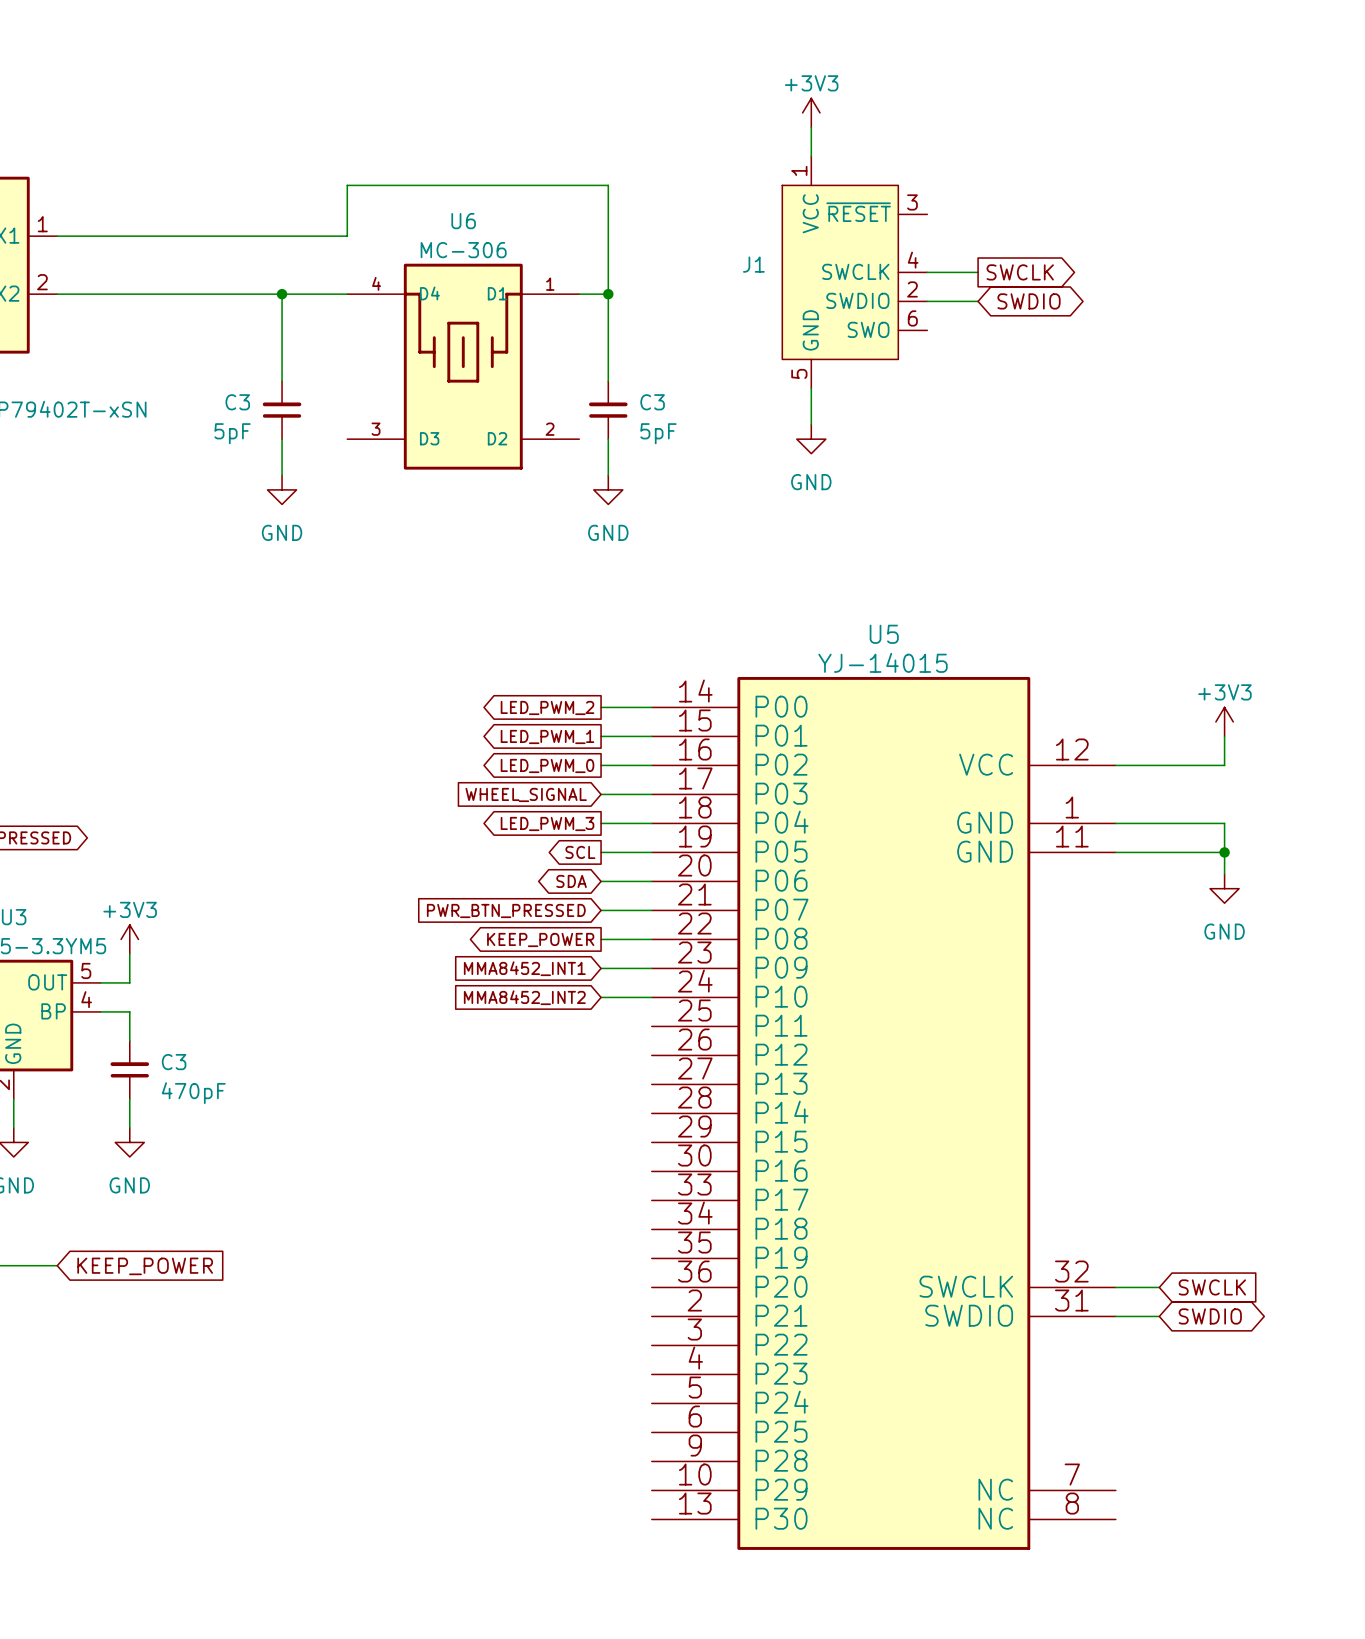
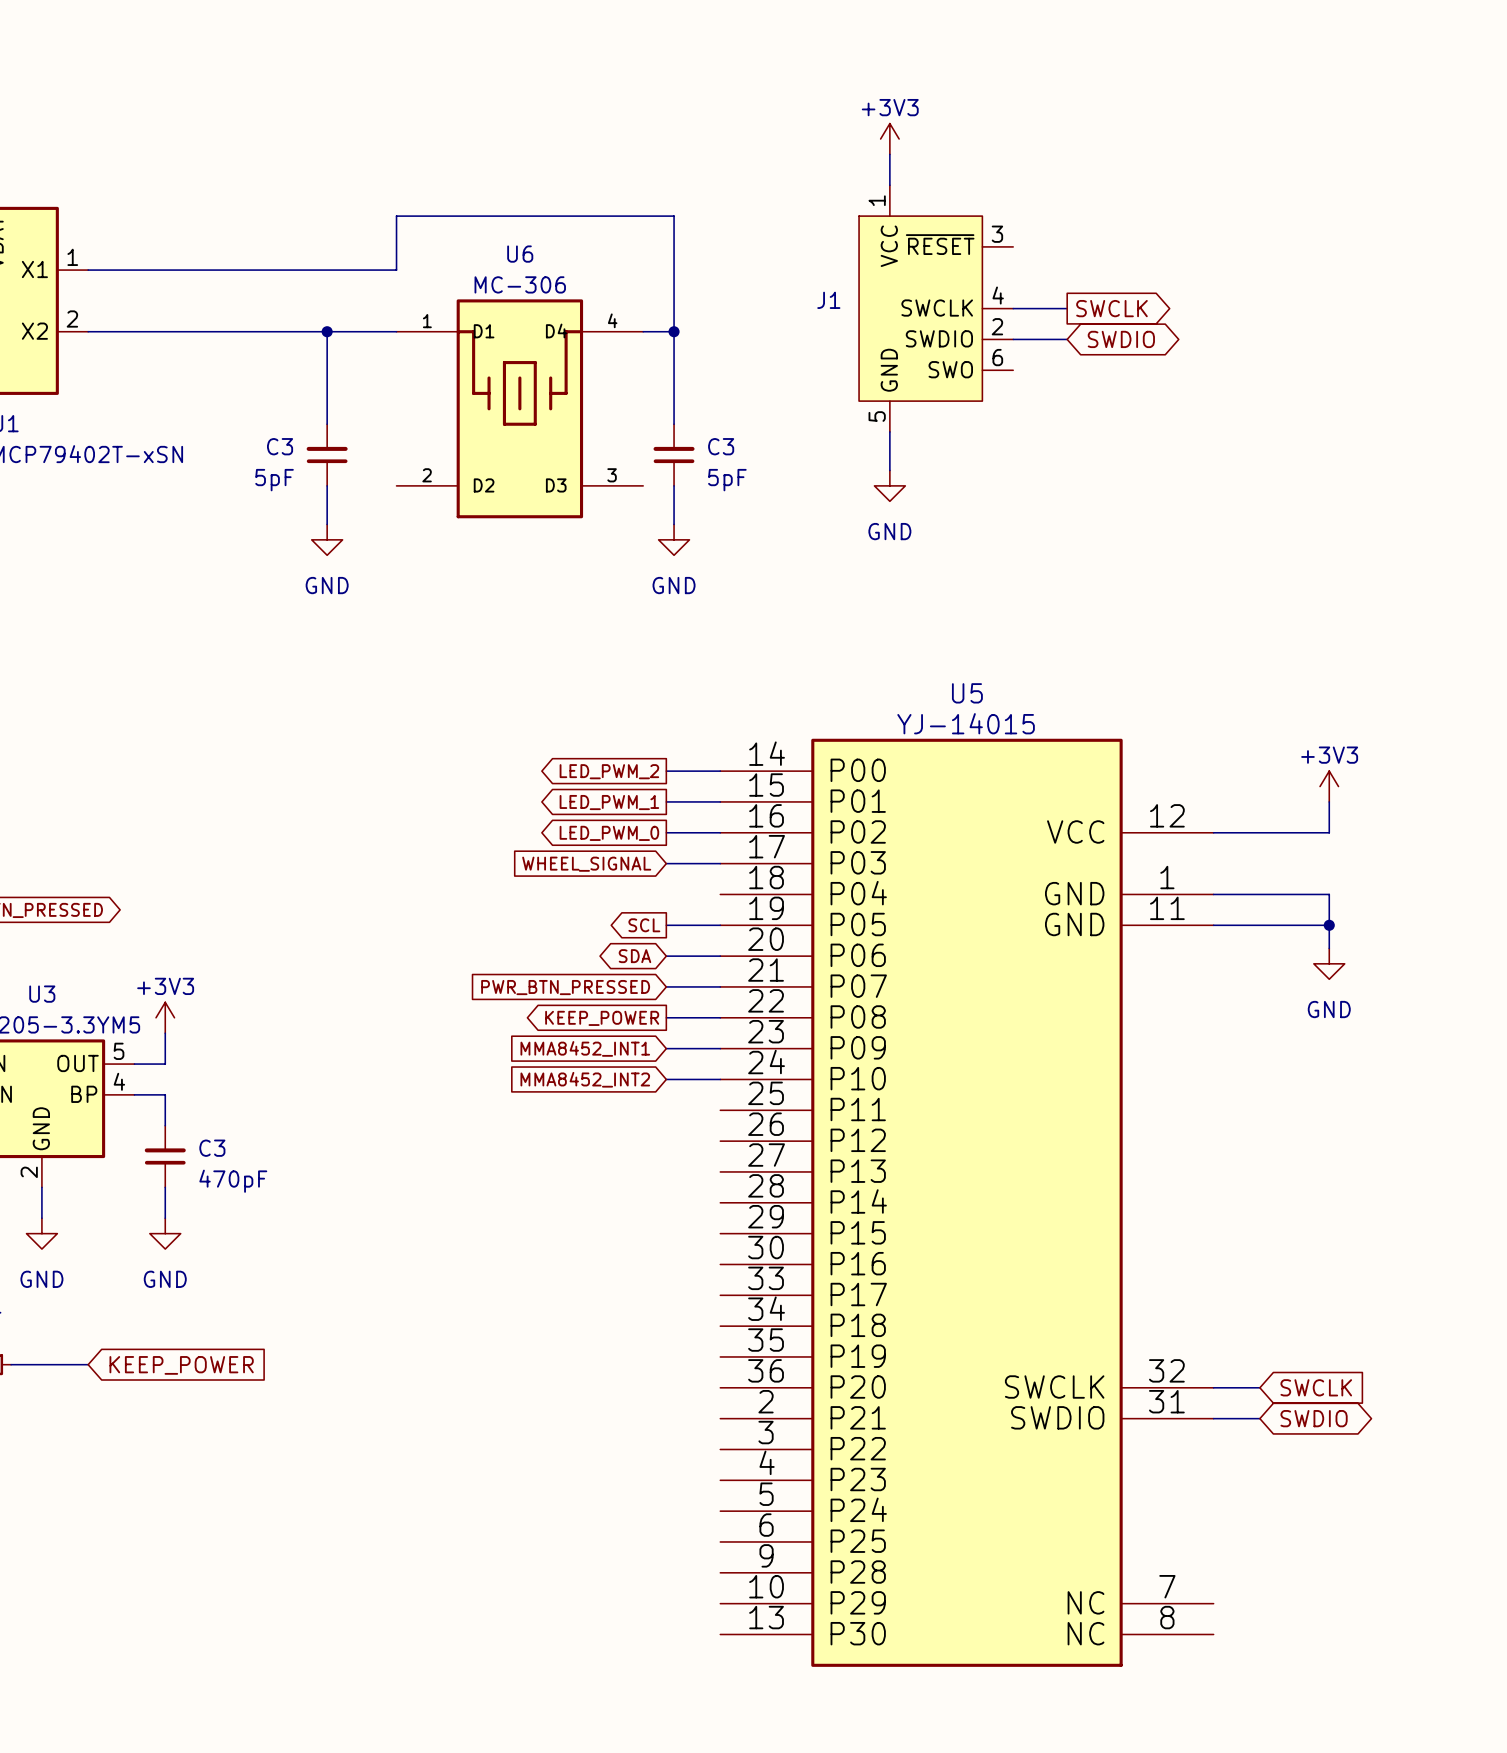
U6 flip: as is (463, 366) -> left-right (519, 408)
global label: LED_PWM_3 (547, 823) -> none
wire: (601, 823) (651, 823) -> none

